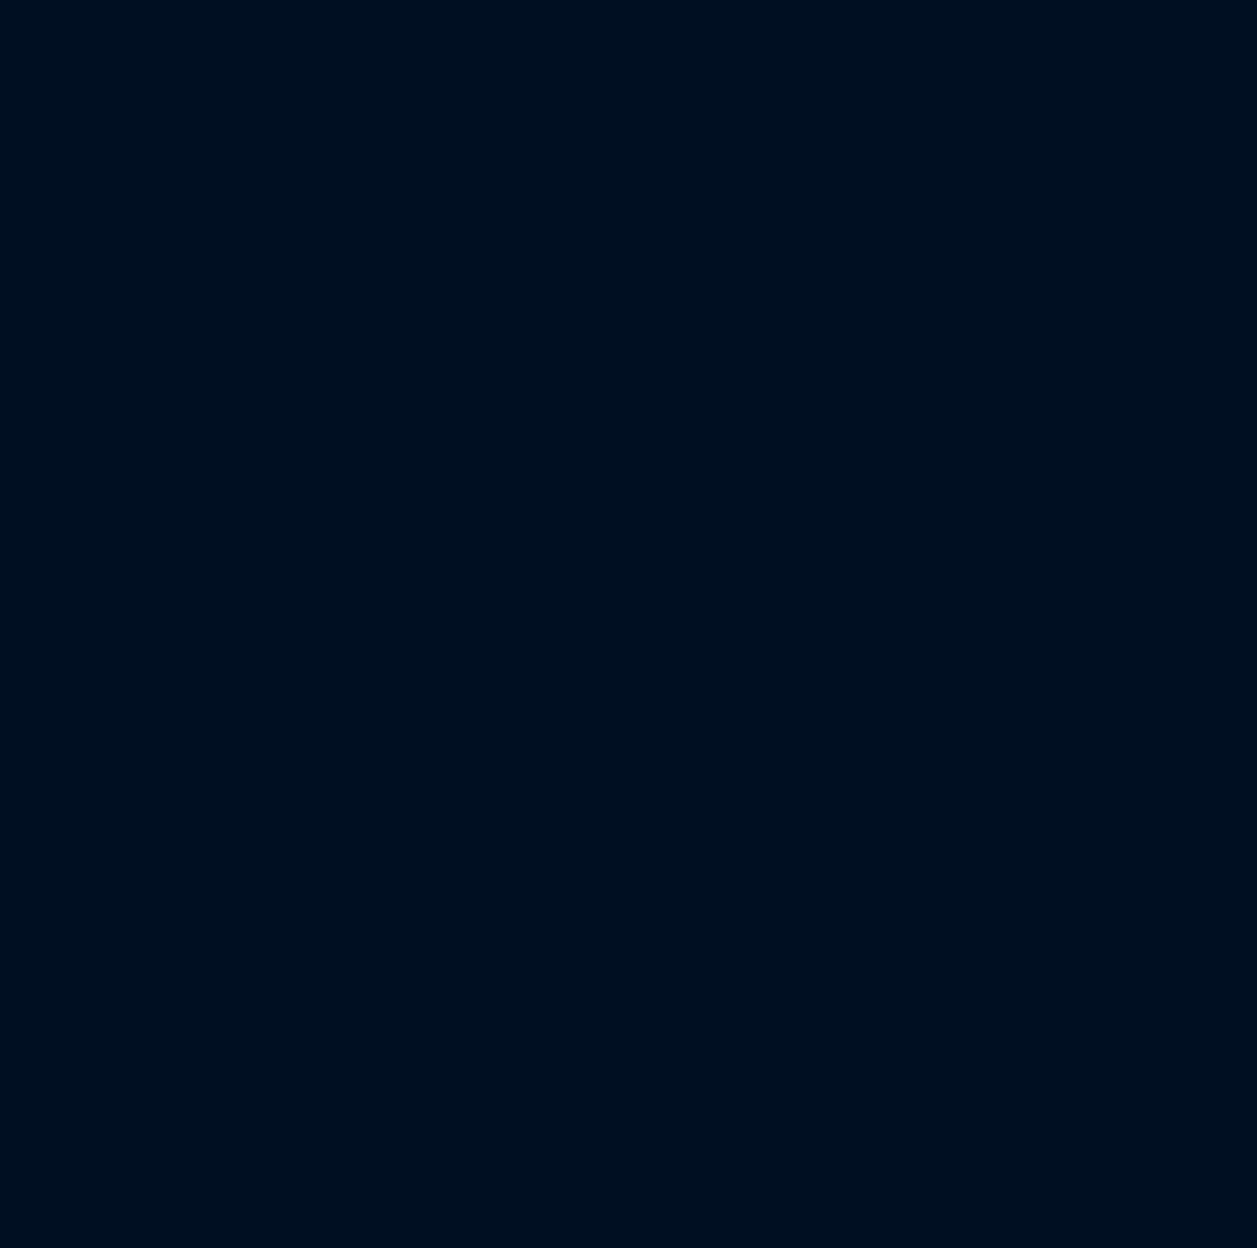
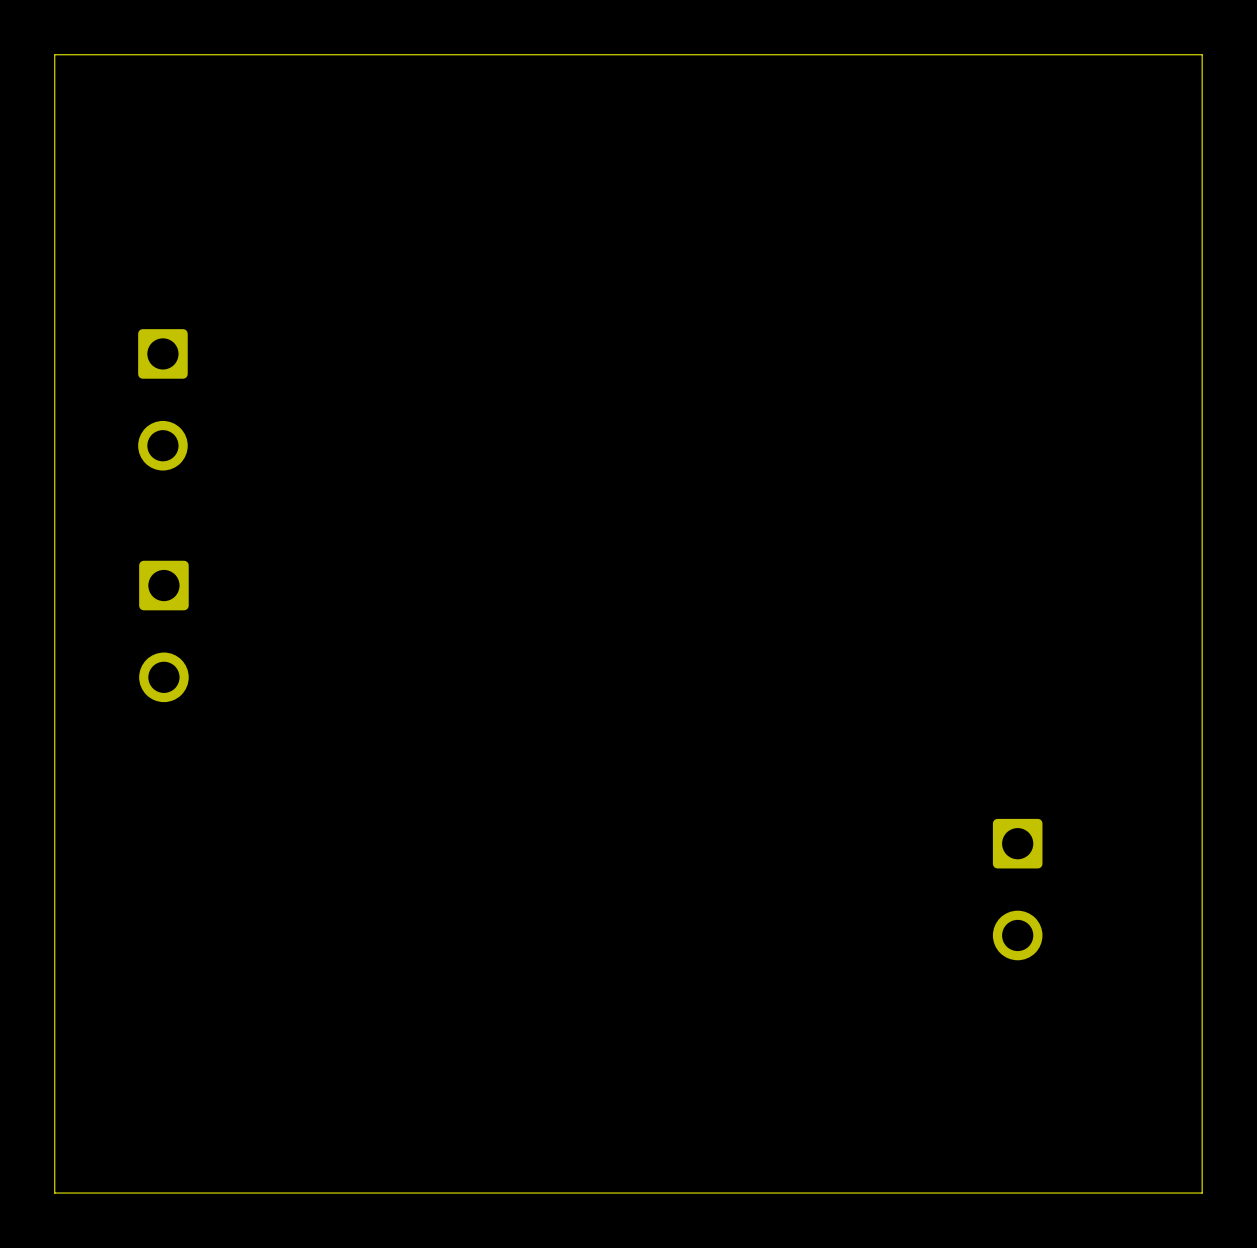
board edge: none -> (1202, 54) (1202, 1193) (54, 1193) (54, 54) (1202, 54)
part: none -> (162, 399)
part: none -> (163, 631)
part: none -> (1017, 889)

